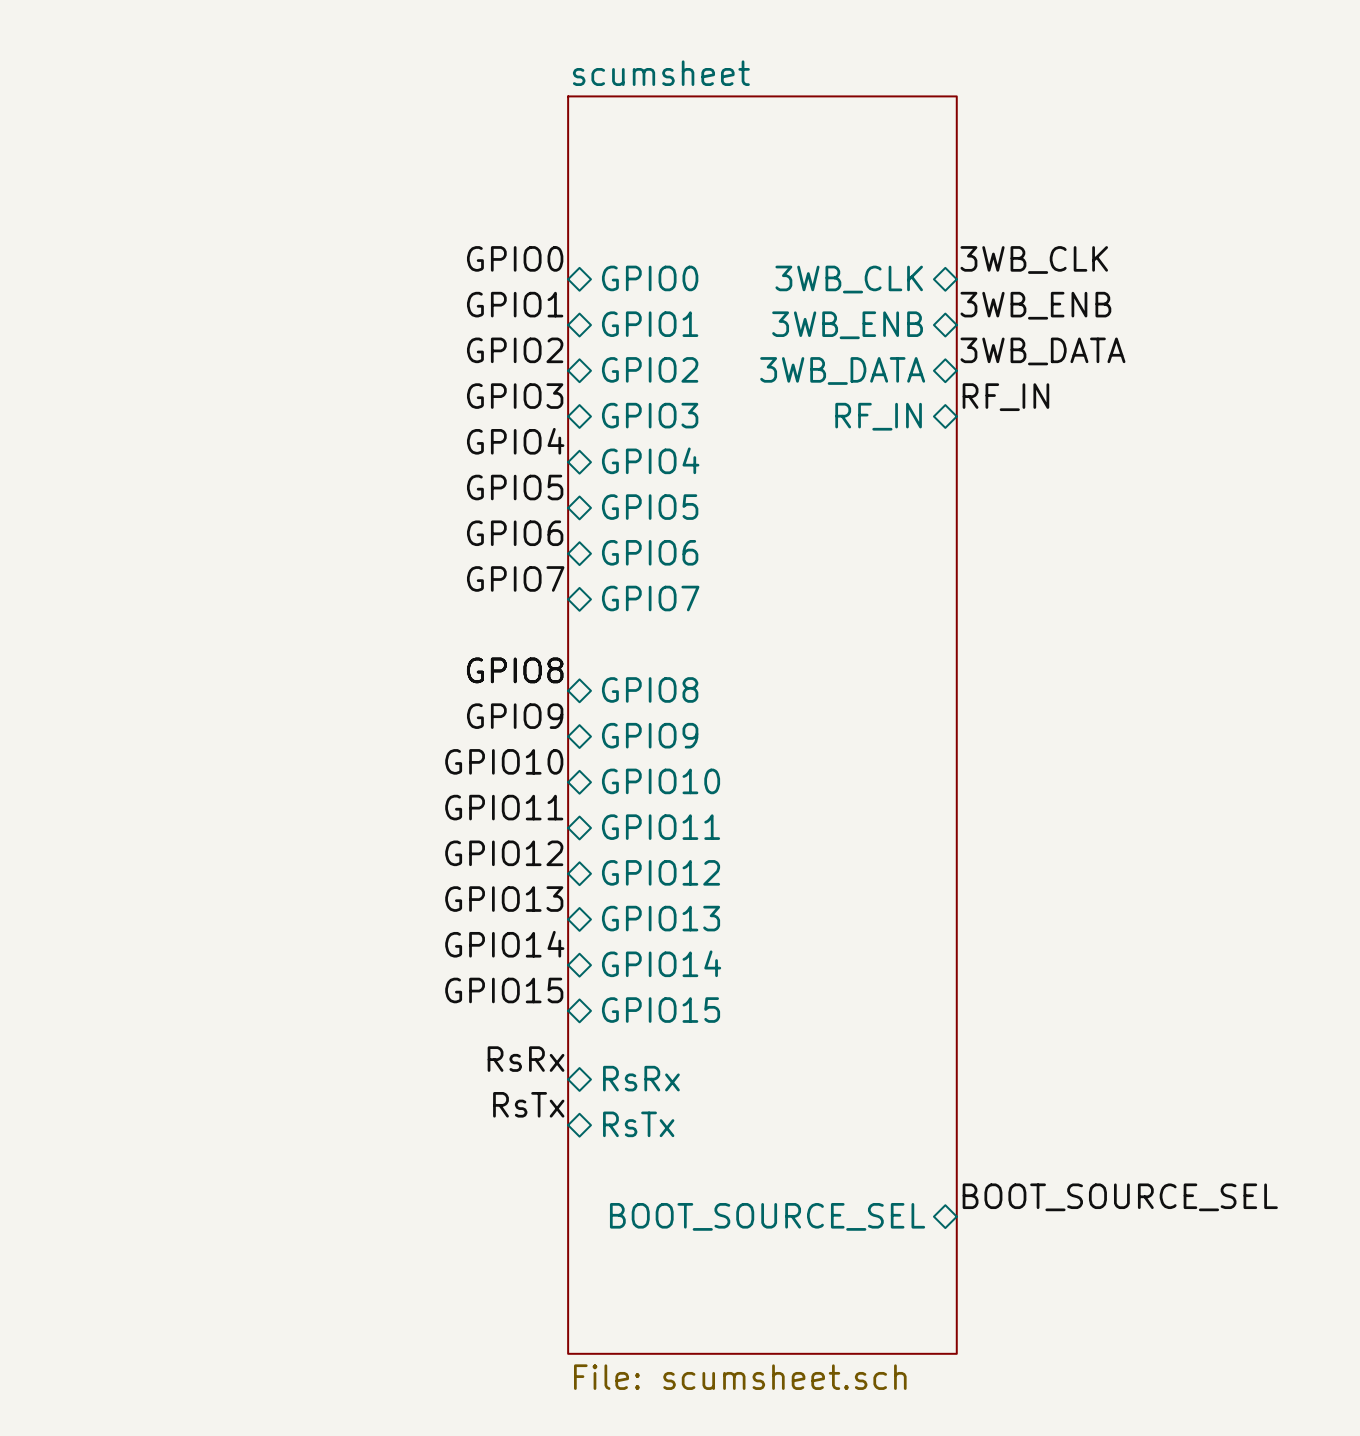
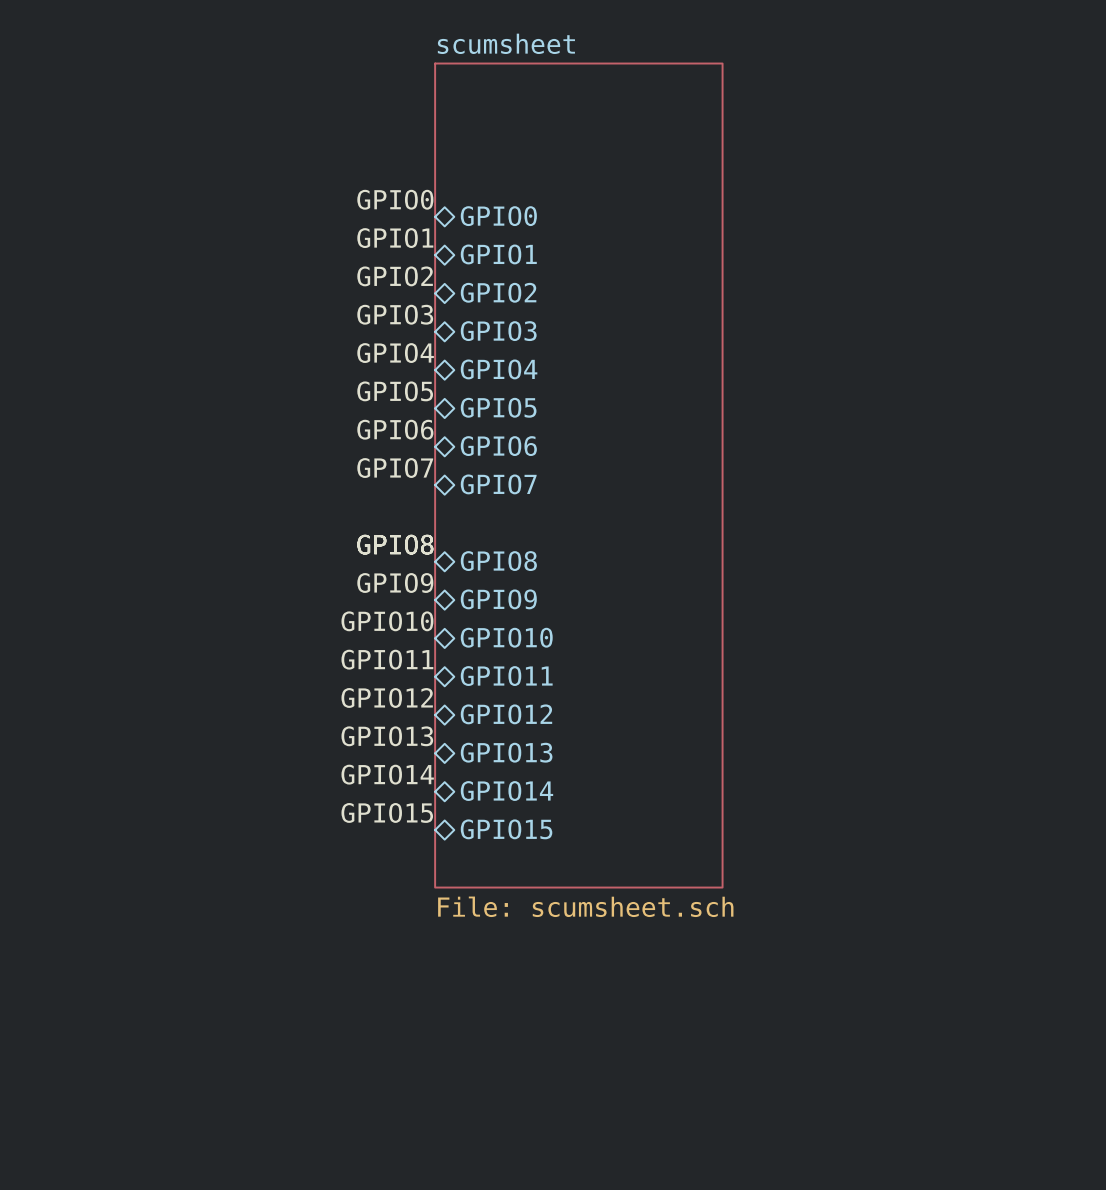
label: 3WB_CLK (1034, 259) -> none
sheet pin: 3WB_CLK (849, 279) -> none
label: 3WB_ENB (1035, 305) -> none
sheet pin: 3WB_ENB (847, 325) -> none
label: 3WB_DATA (1042, 351) -> none
sheet pin: 3WB_DATA (842, 370) -> none
label: RF_IN (1005, 397) -> none
sheet pin: RF_IN (878, 416) -> none
sheet scumsheet: none -> File: scumsheet.sch (578, 475)
sheet scumsheet: File: scumsheet.sch (762, 725) -> none
label: RsRx (526, 1059) -> none
sheet pin: RsRx (641, 1078) -> none
label: RsTx (528, 1104) -> none
sheet pin: RsTx (638, 1124) -> none
label: BOOT_SOURCE_SEL (1120, 1197) -> none
sheet pin: BOOT_SOURCE_SEL (767, 1216) -> none

